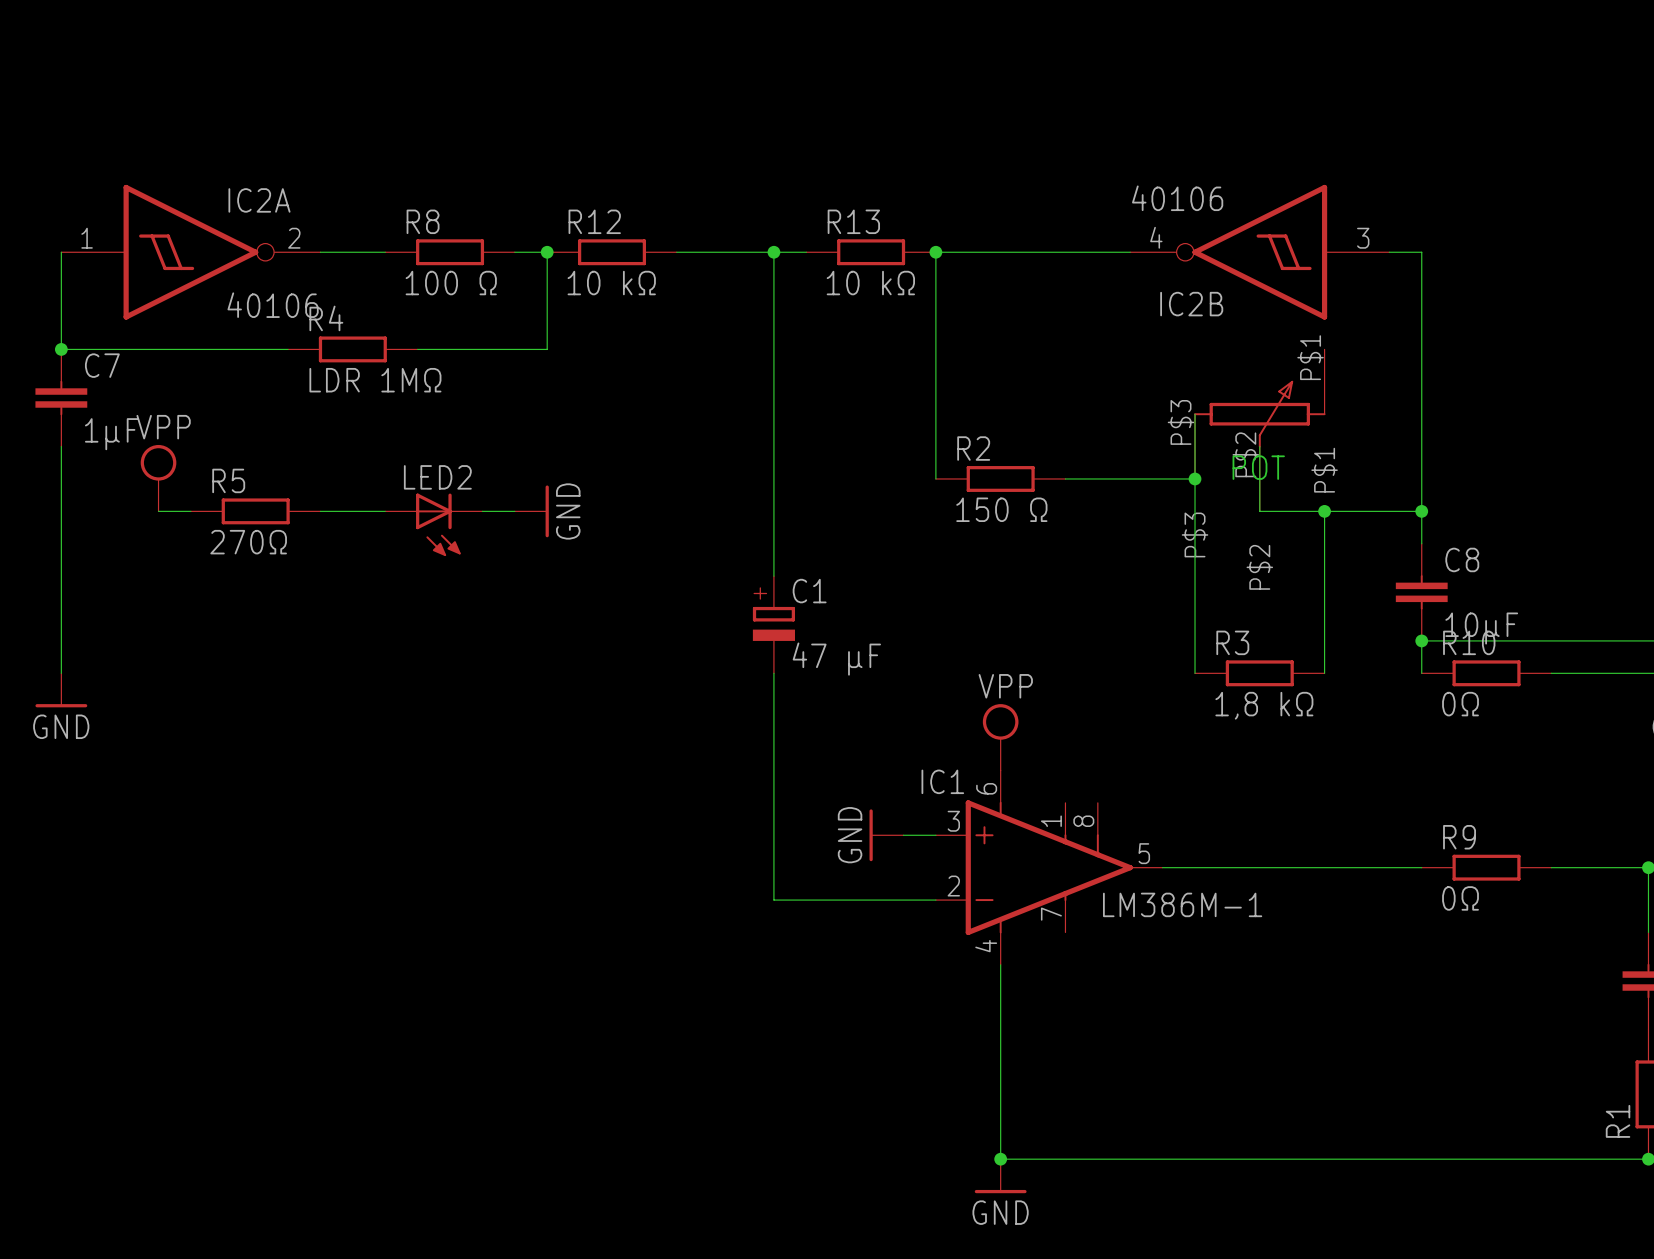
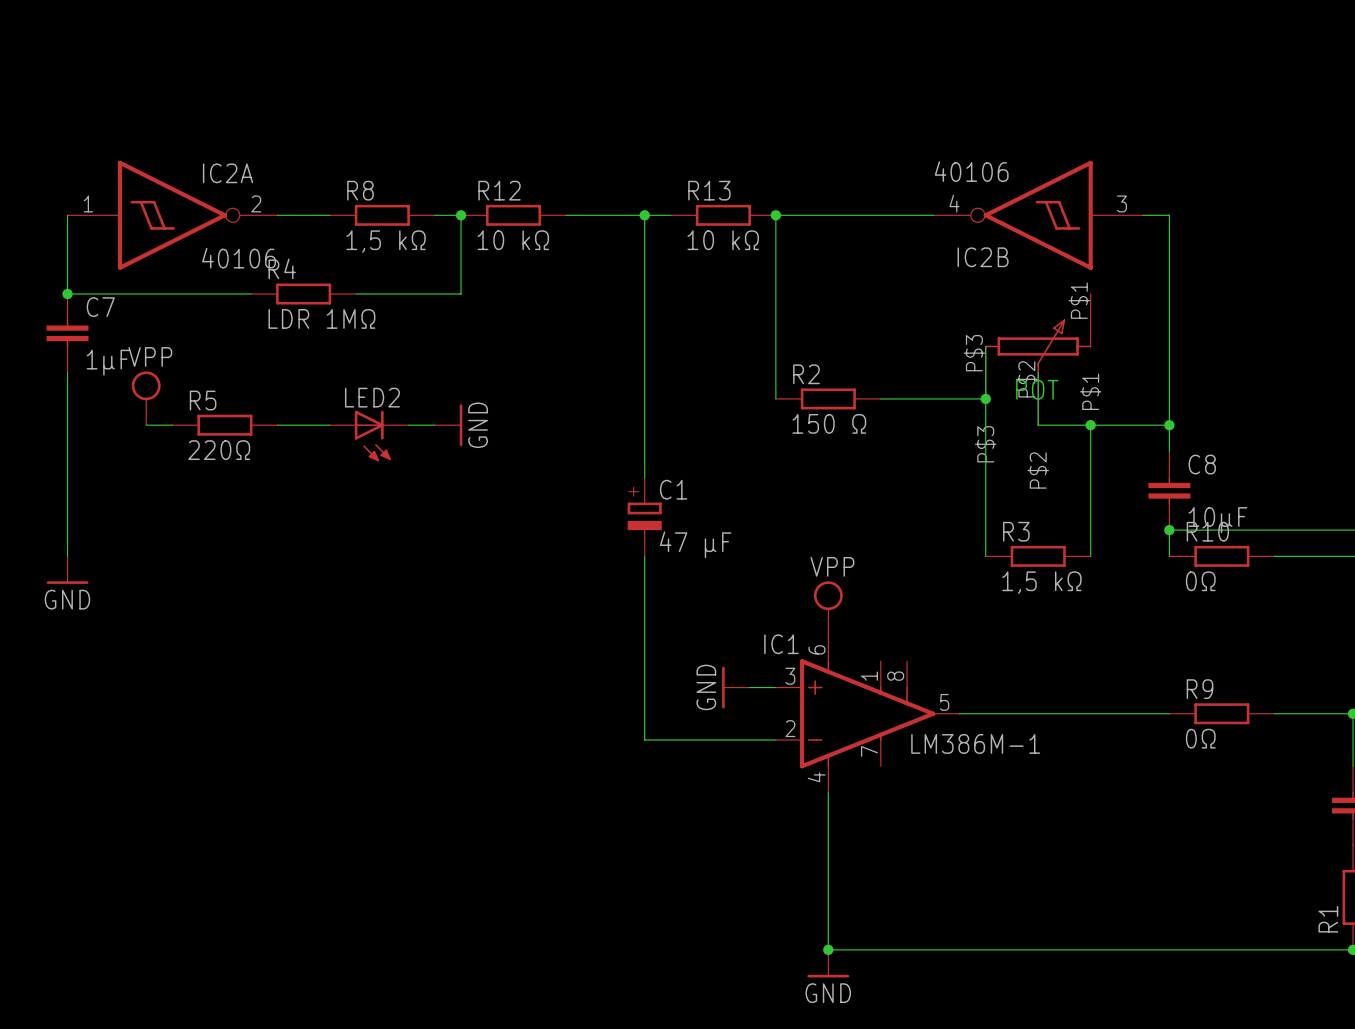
R8 value: 100 Ω (451, 283) -> 1,5 kΩ (386, 241)
R5 value: 270Ω (248, 542) -> 220Ω (219, 450)
R3 value: 1,8 kΩ (1264, 705) -> 1,5 kΩ (1041, 582)

